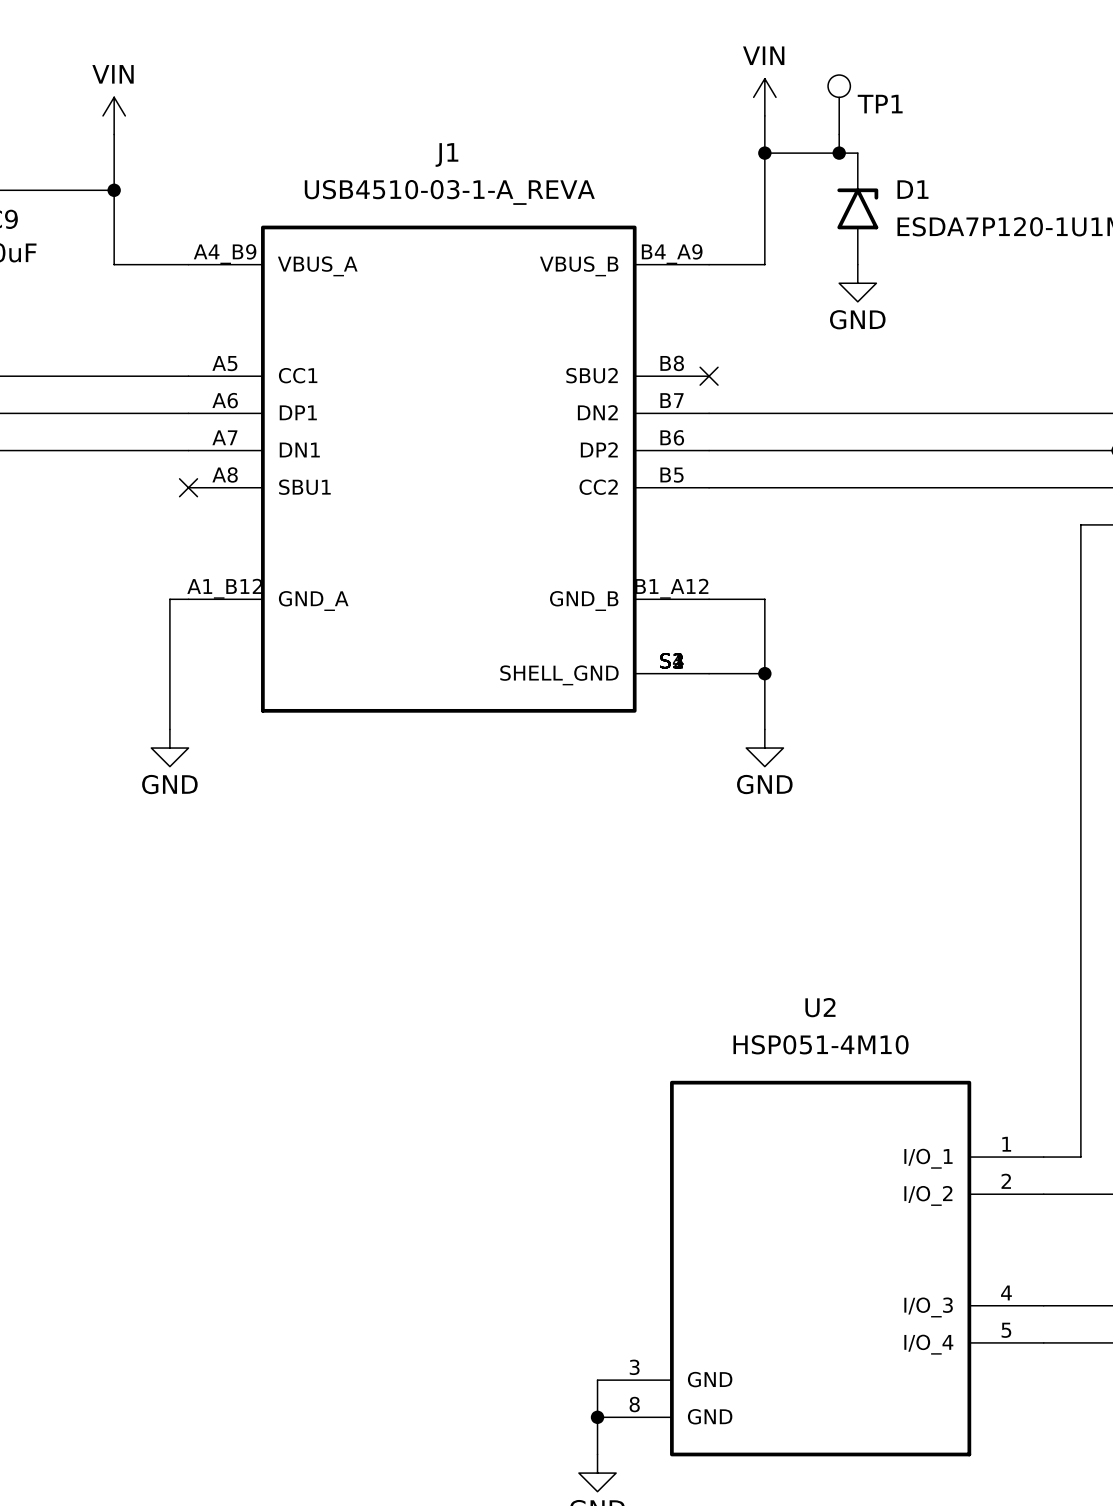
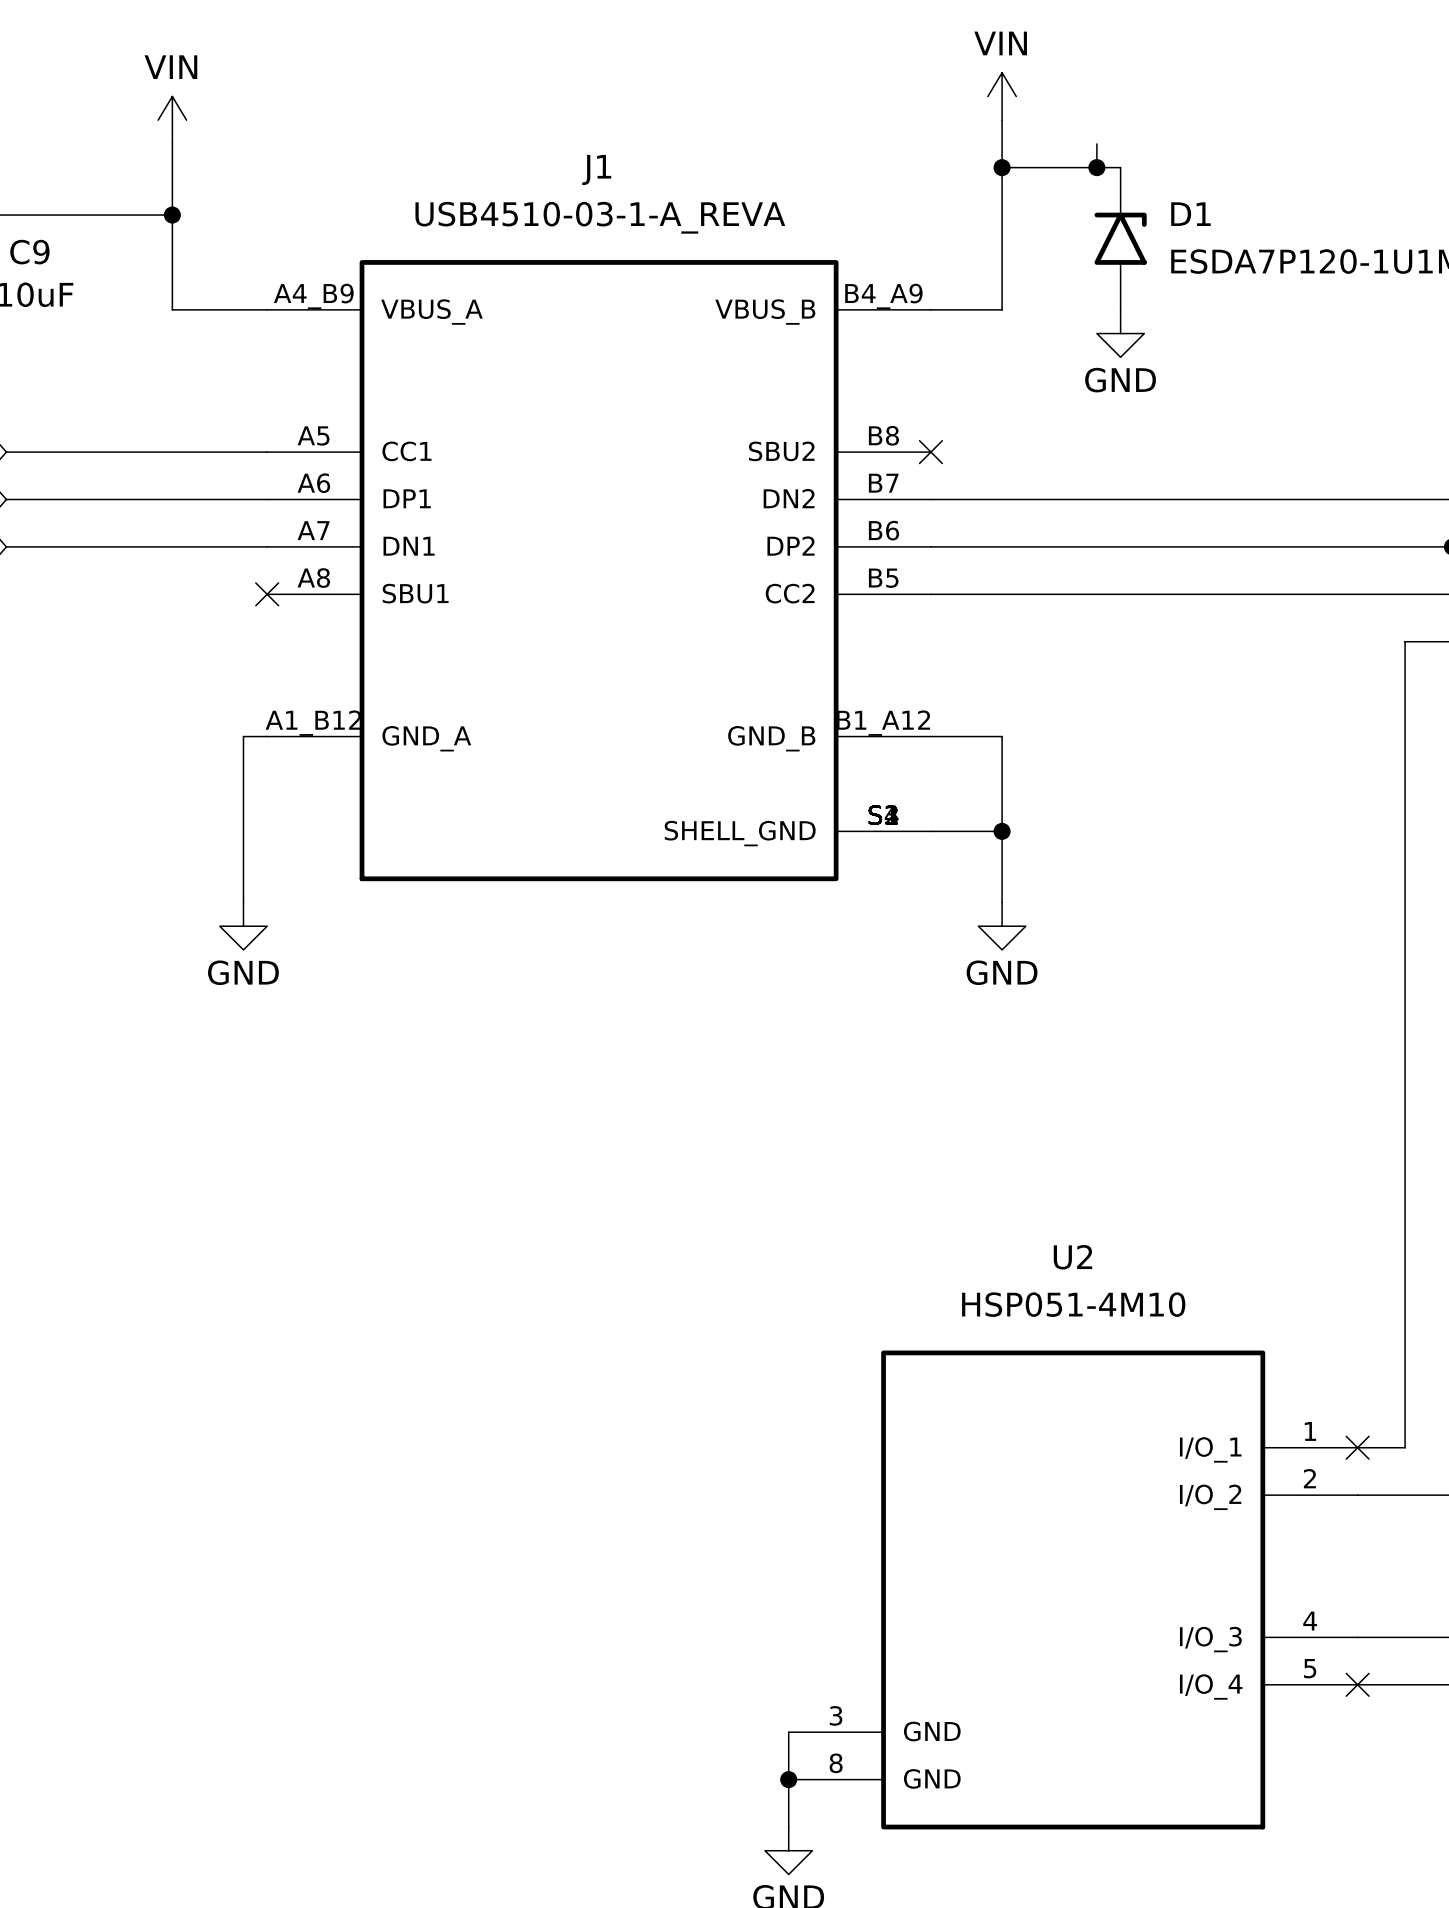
TP1: (839, 104) -> none
no-connect mark: none -> (1357, 1447)
no-connect mark: none -> (1357, 1684)

